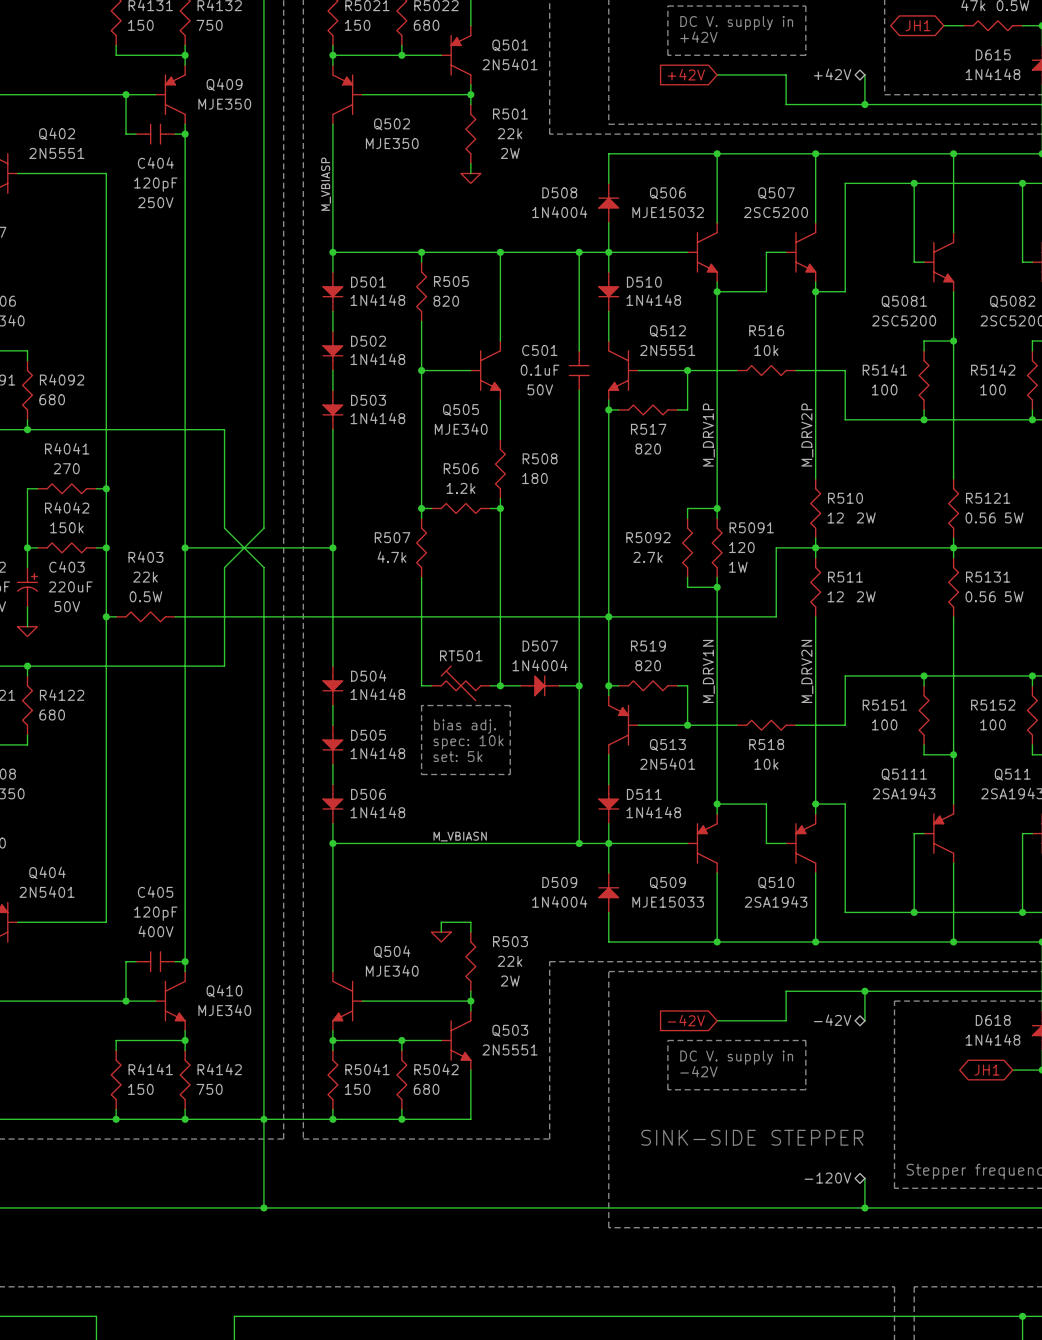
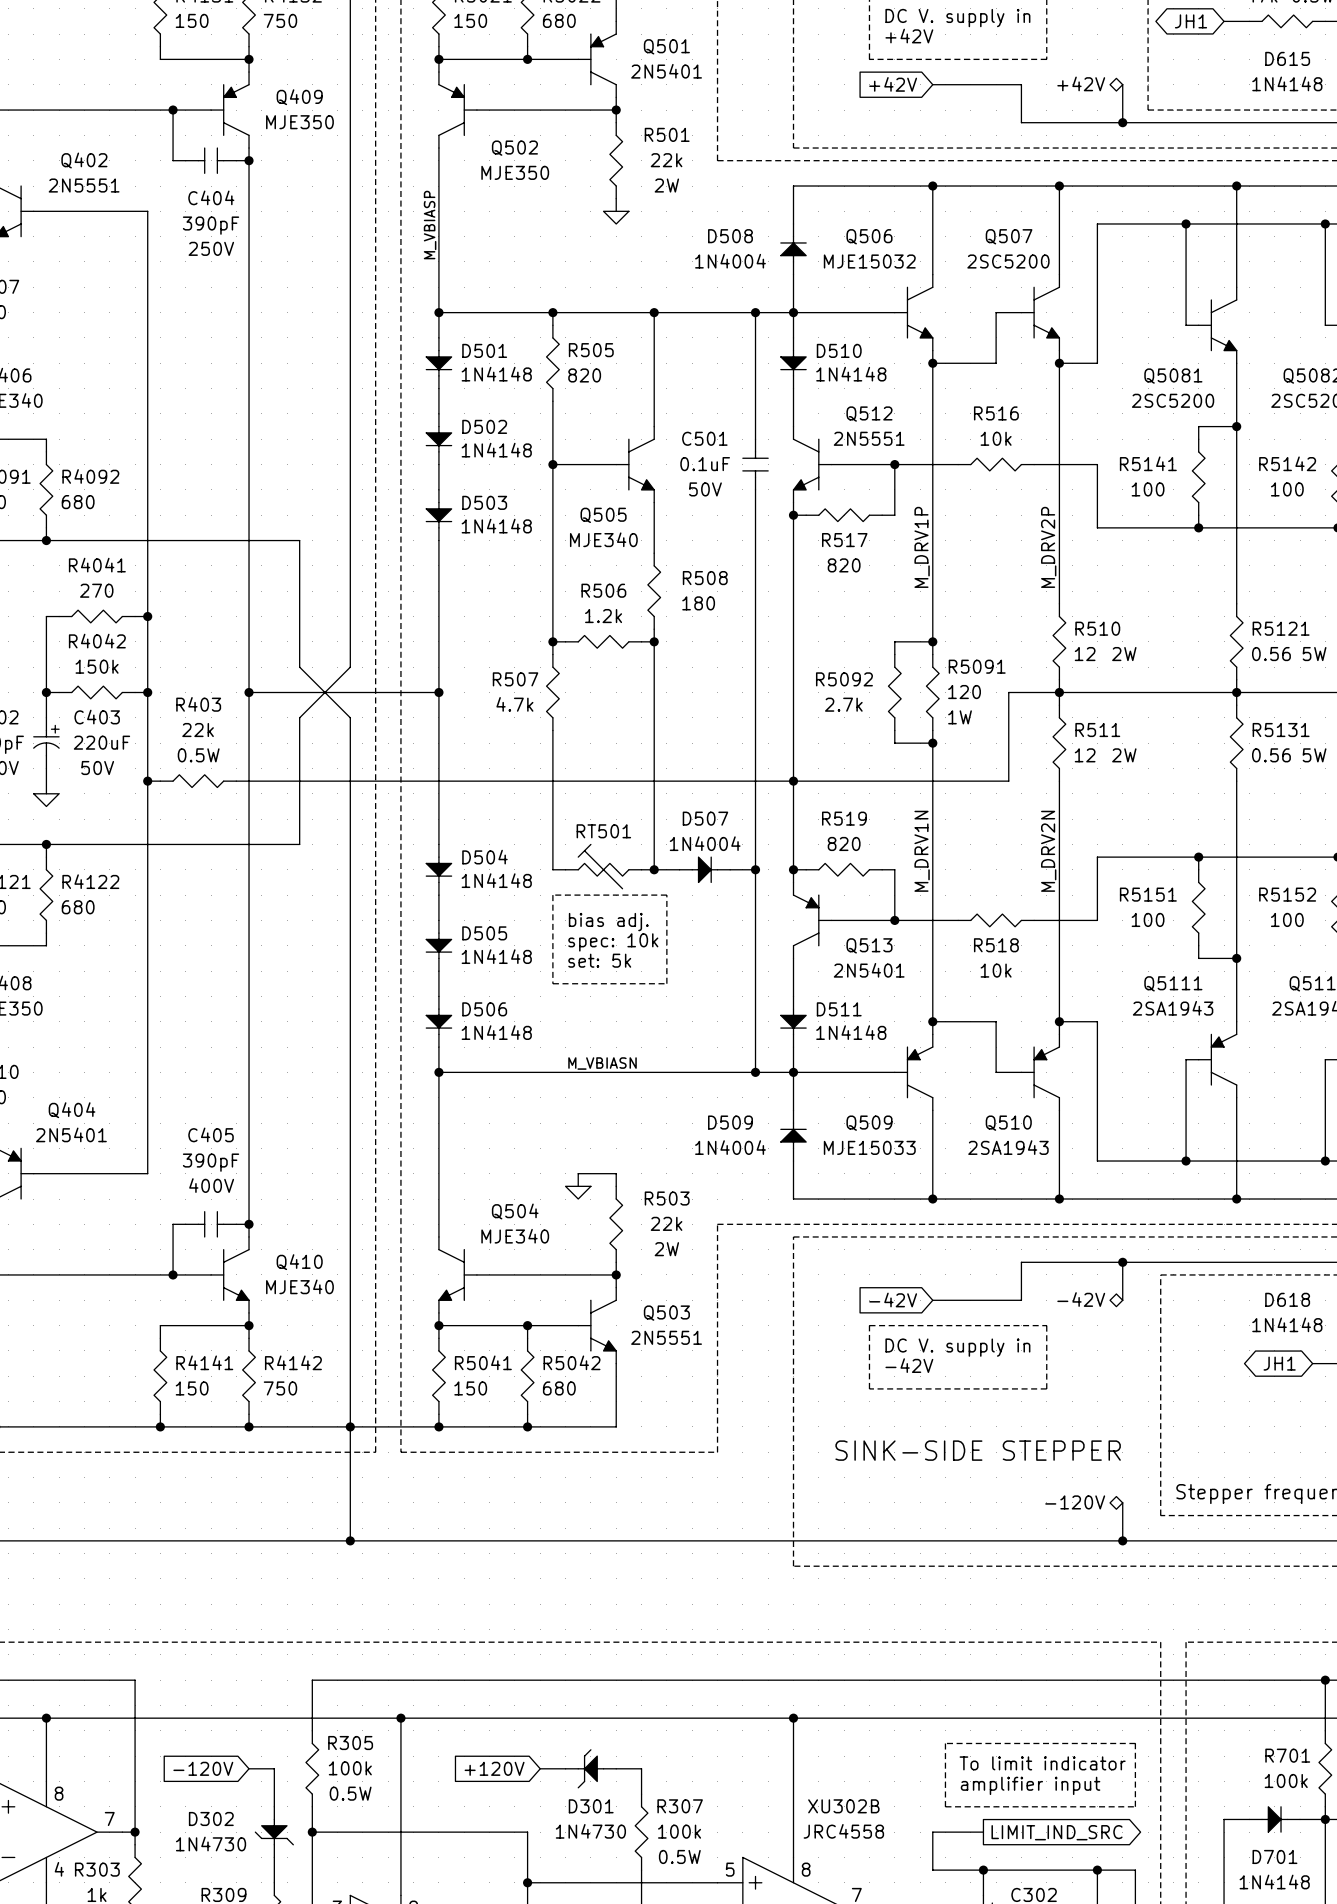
C404 value: 120pF (155, 184) -> 390pF (211, 225)
C405 value: 120pF (155, 913) -> 390pF (211, 1162)

